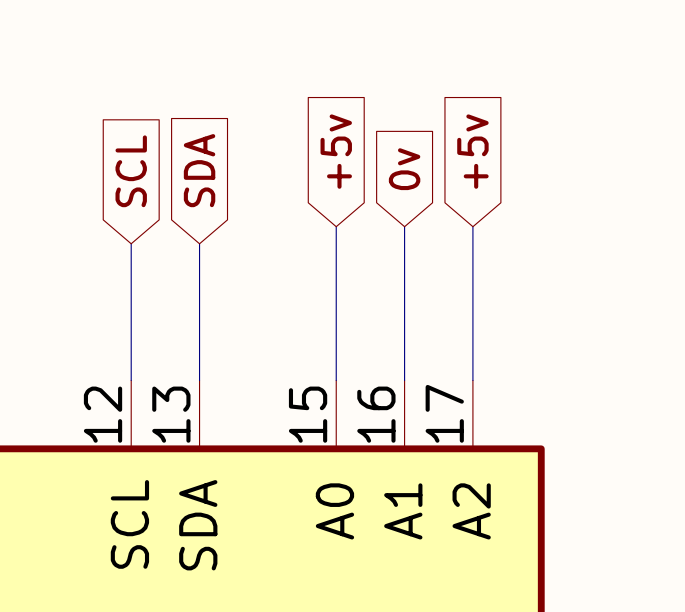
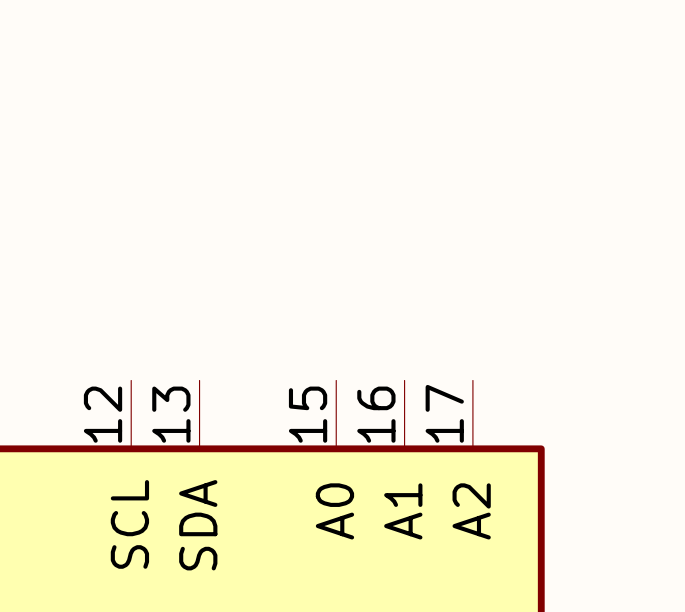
global label: +5v (336, 151) -> none
global label: +5v (472, 151) -> none
global label: 0v (404, 169) -> none
global label: SDA (199, 170) -> none
global label: SCL (131, 171) -> none
wire: (336, 226) (336, 380) -> none
wire: (404, 226) (404, 380) -> none
wire: (472, 226) (472, 380) -> none
wire: (131, 243) (131, 380) -> none
wire: (199, 243) (199, 380) -> none

